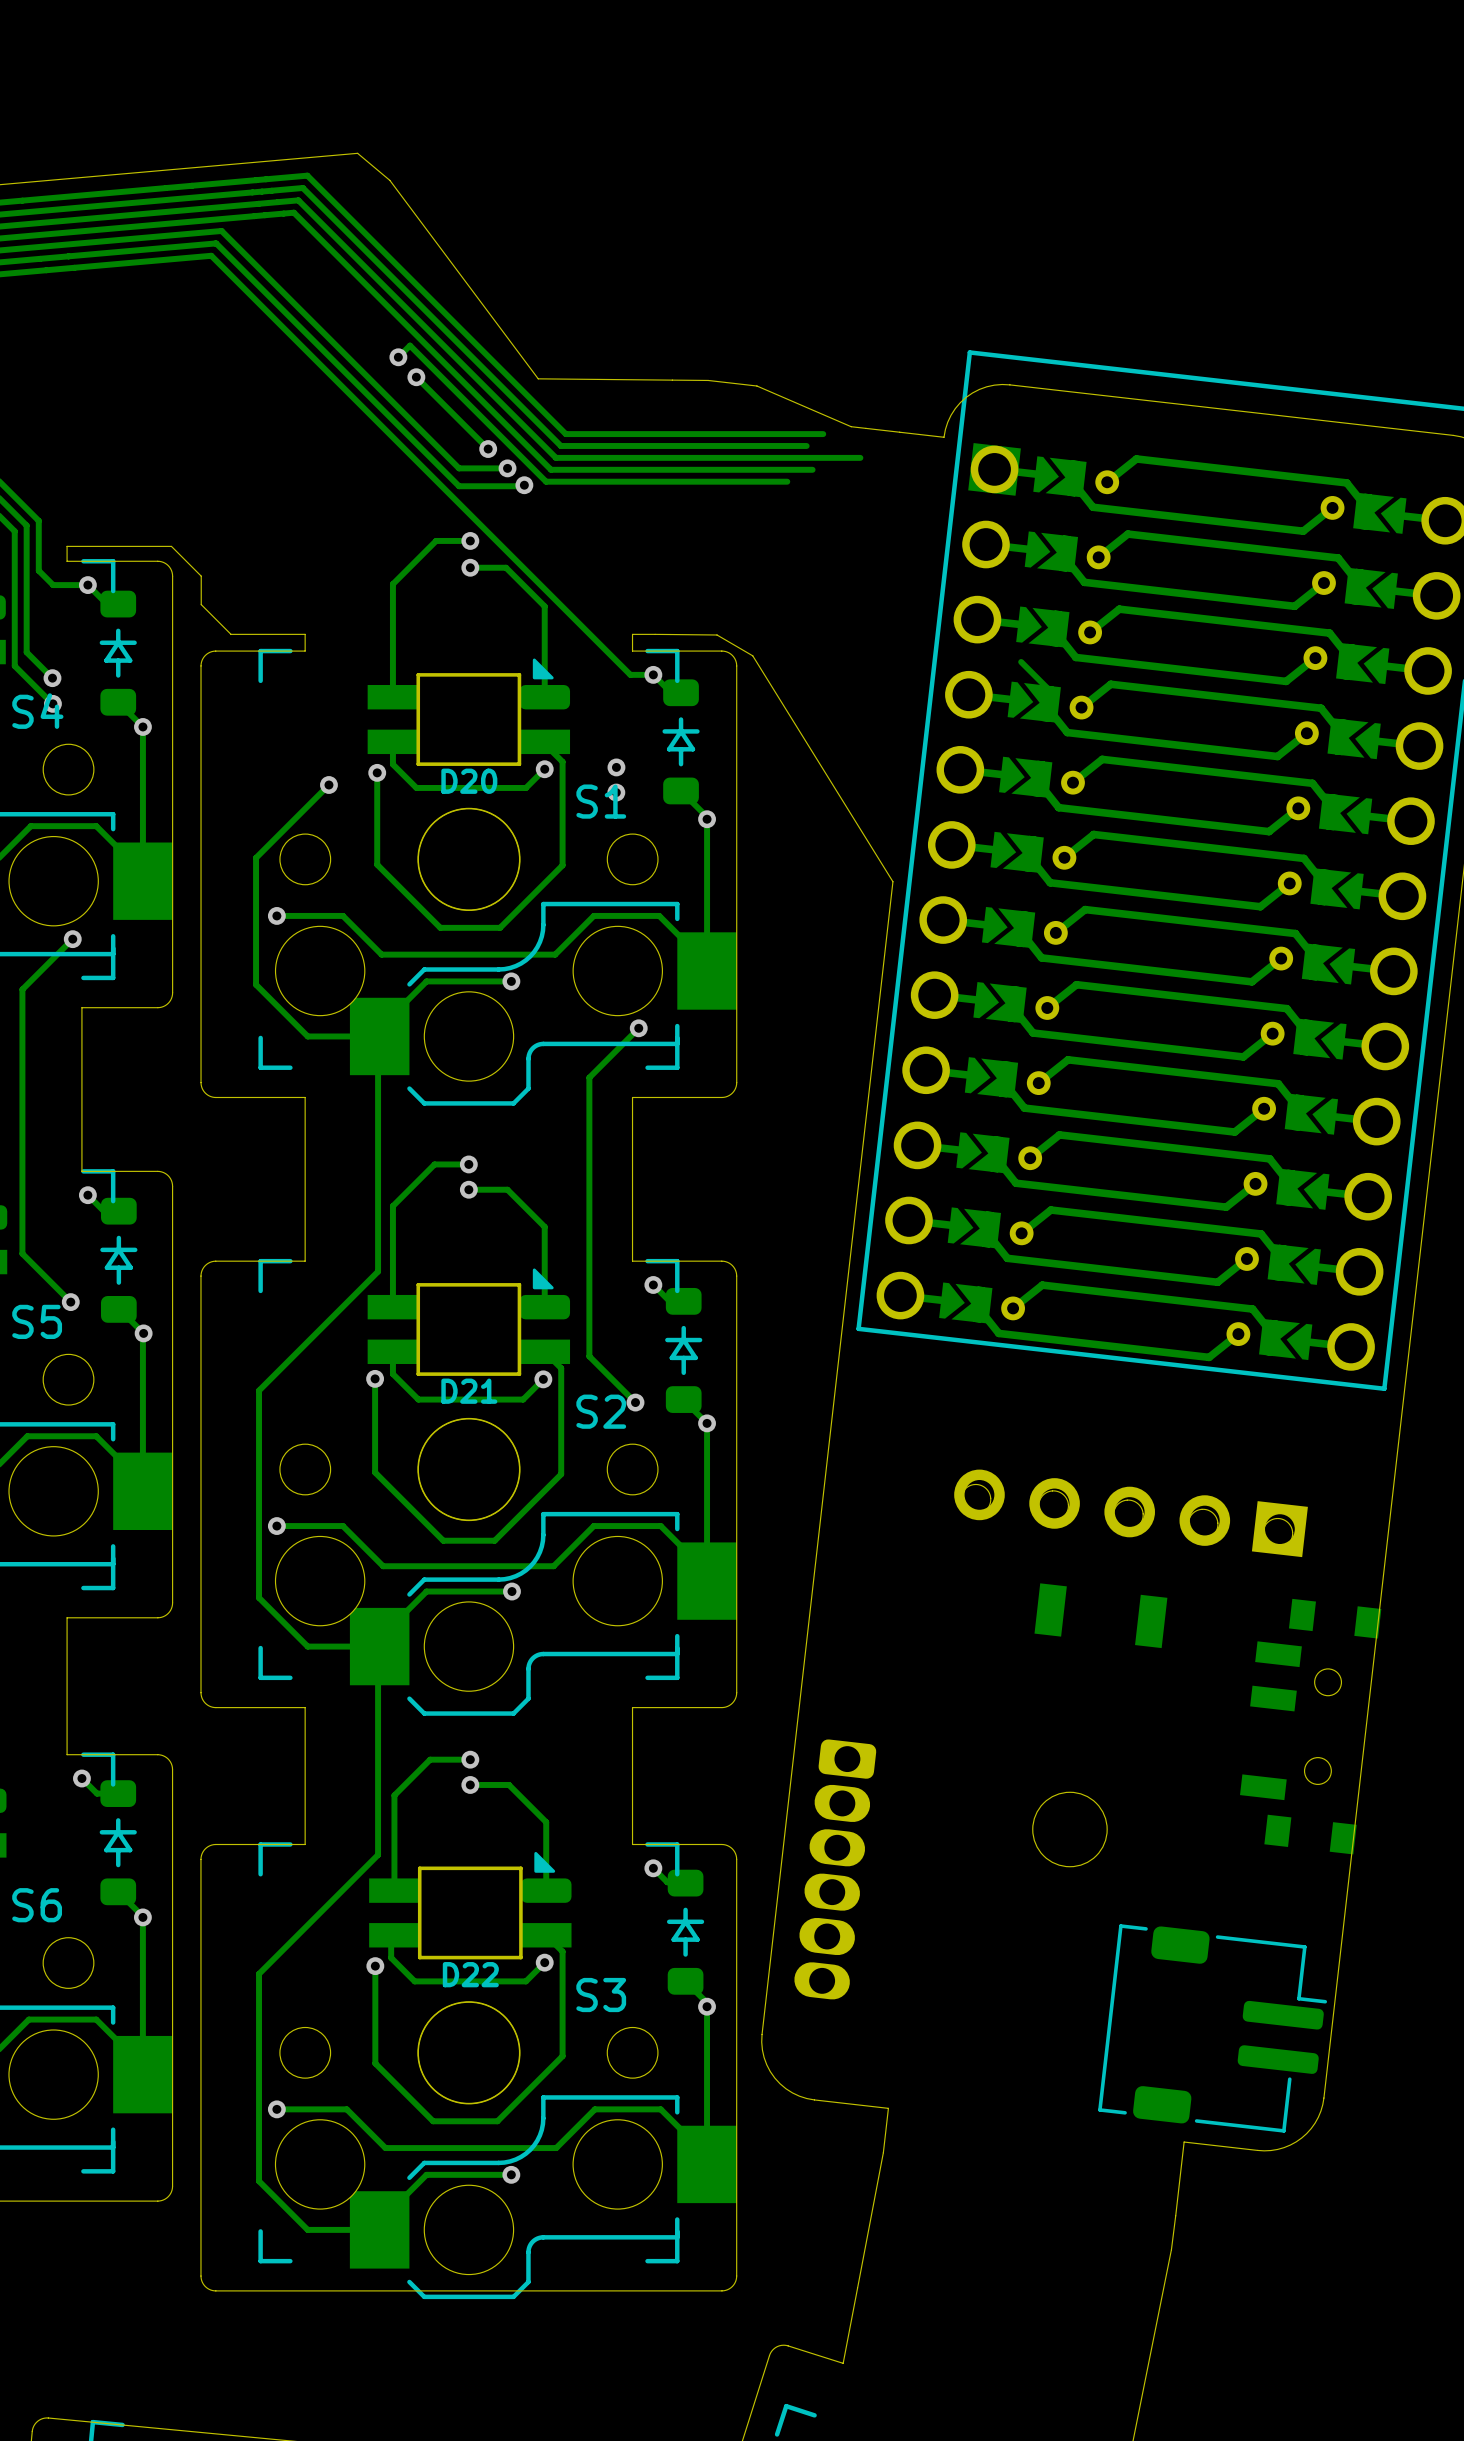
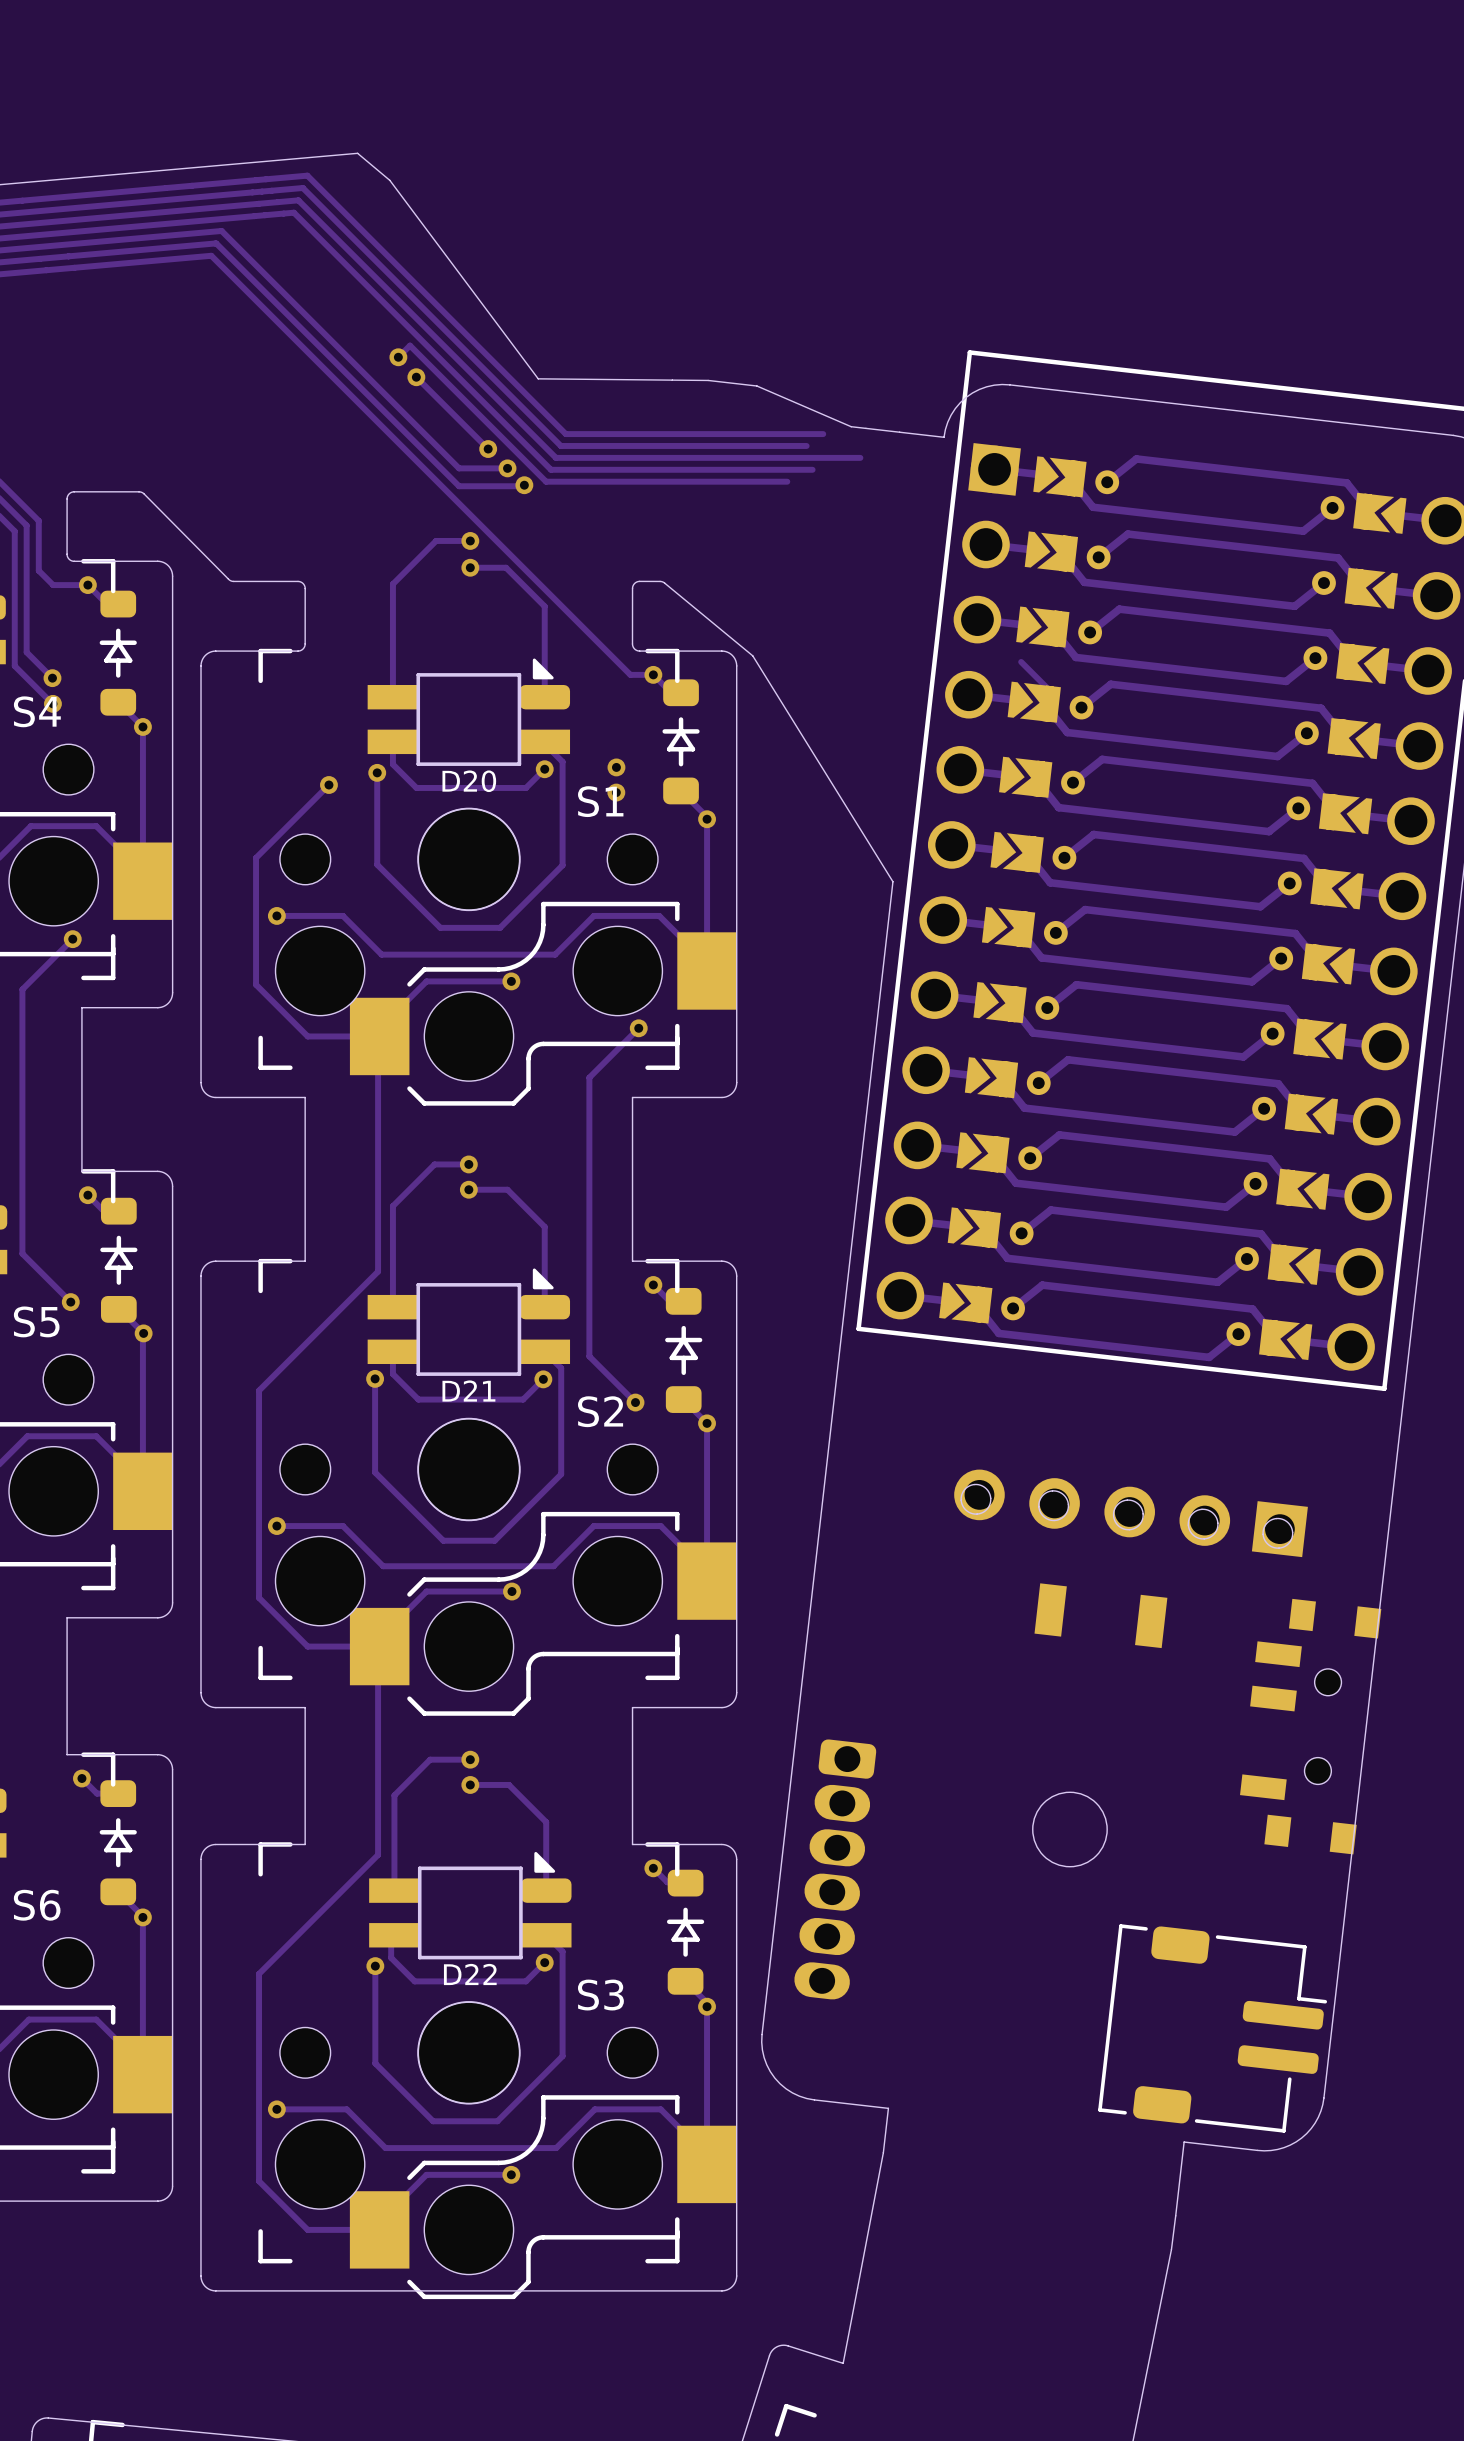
board edge: (157, 561) (67, 561) (67, 546) (171, 546) (201, 576) (201, 604) (231, 634) (305, 634) (305, 651) (215, 651) -> (157, 561) (69, 559) (67, 554) (68, 494) (74, 491) (141, 492) (230, 580) (298, 581) (303, 584) (305, 643) (302, 649) (215, 651)
board edge: (721, 651) (632, 651) (632, 634) (717, 635) (752, 655) -> (721, 651) (635, 649) (632, 643) (634, 584) (639, 581) (664, 582) (752, 655)

